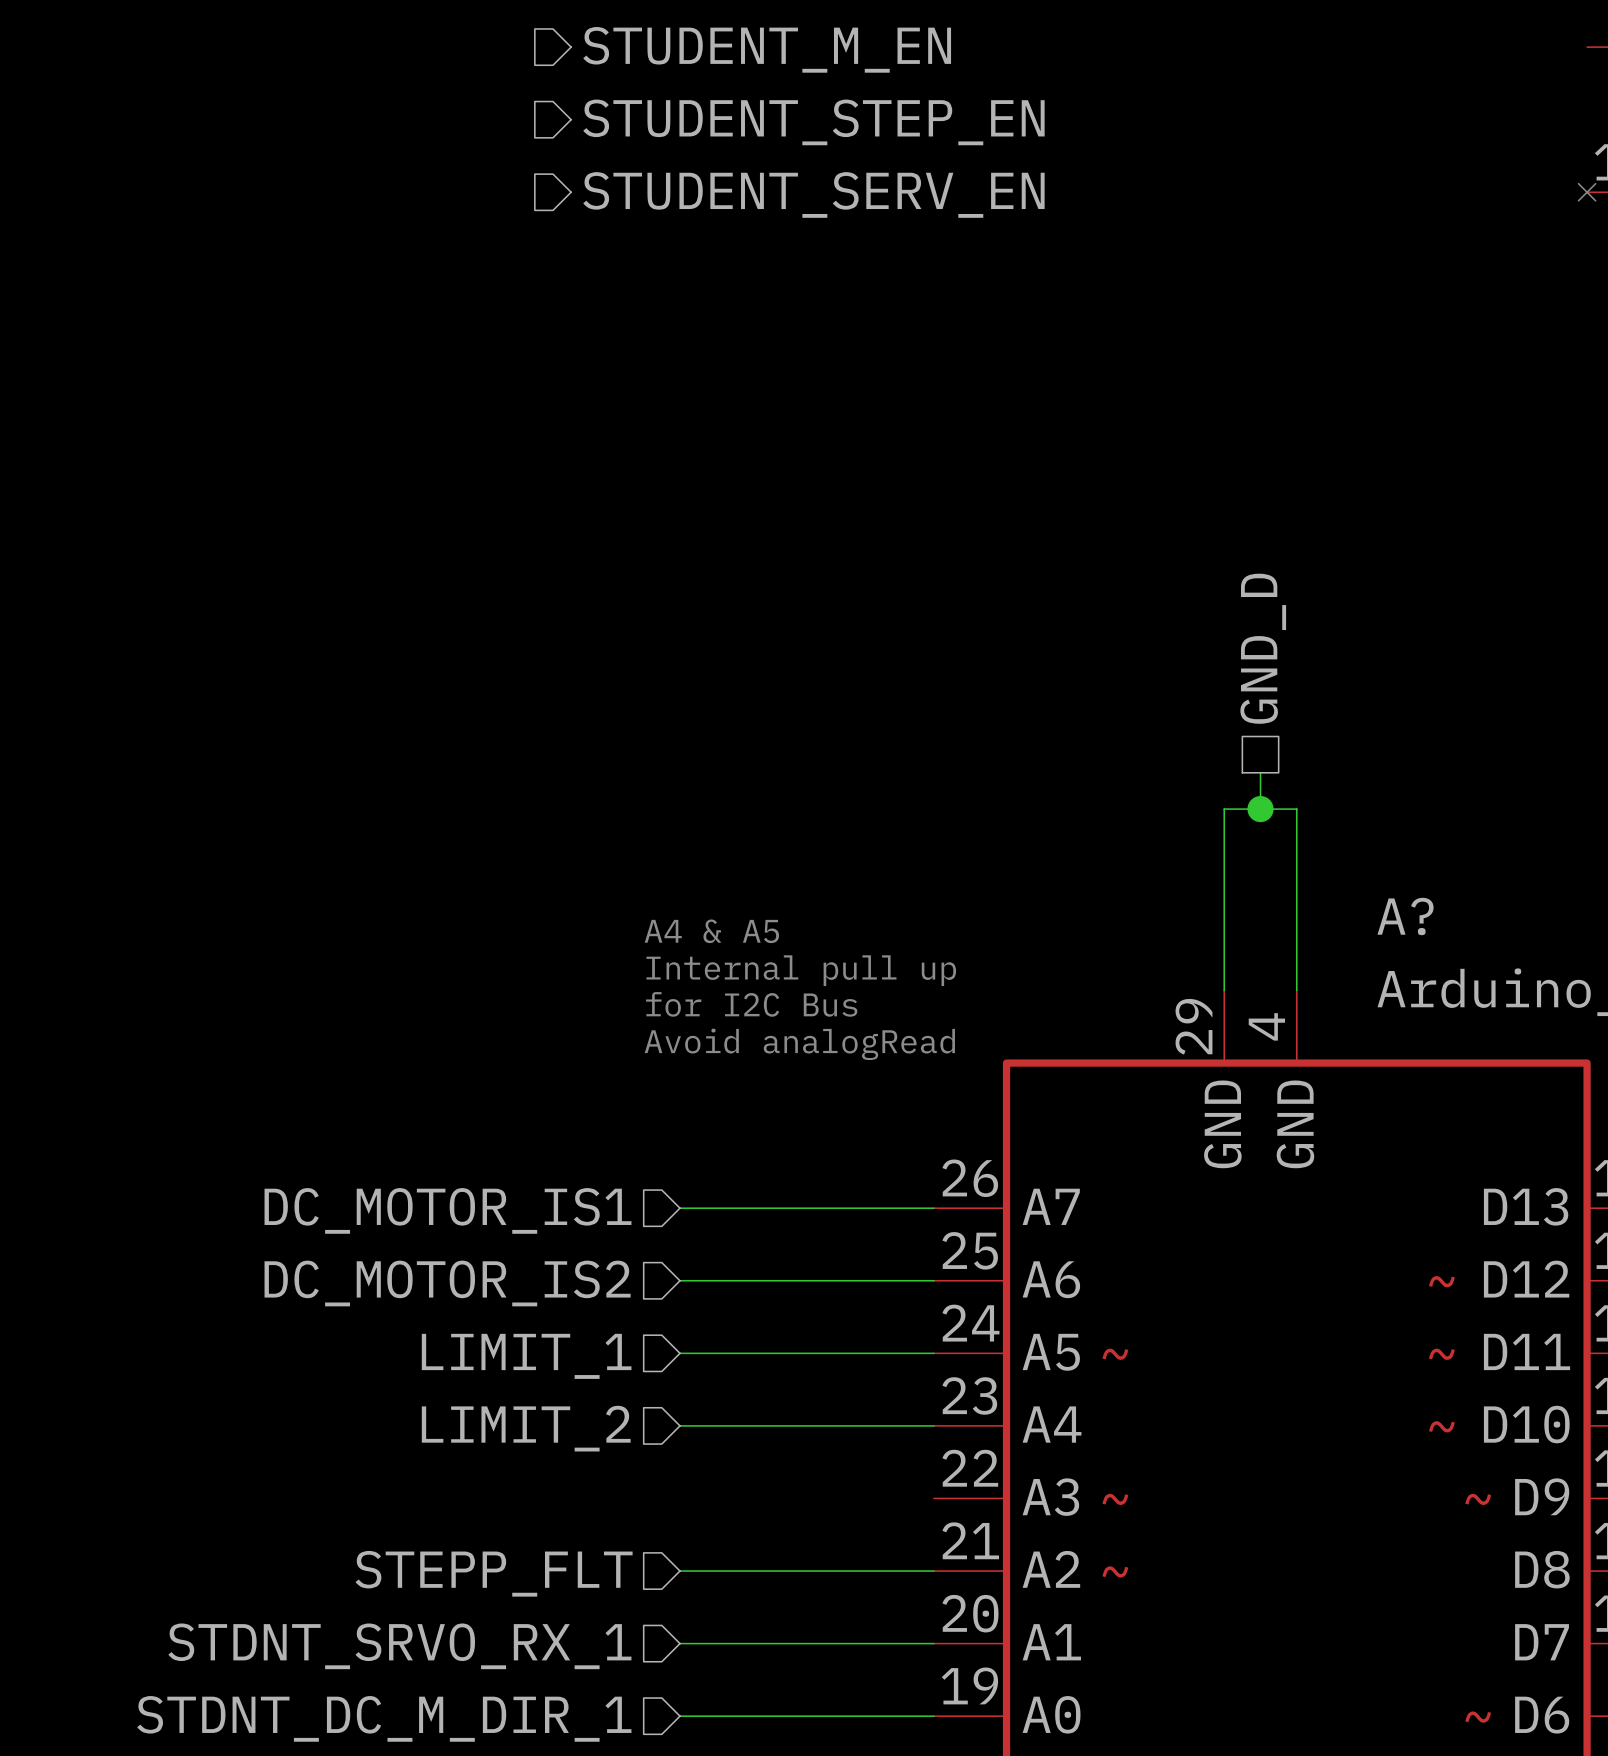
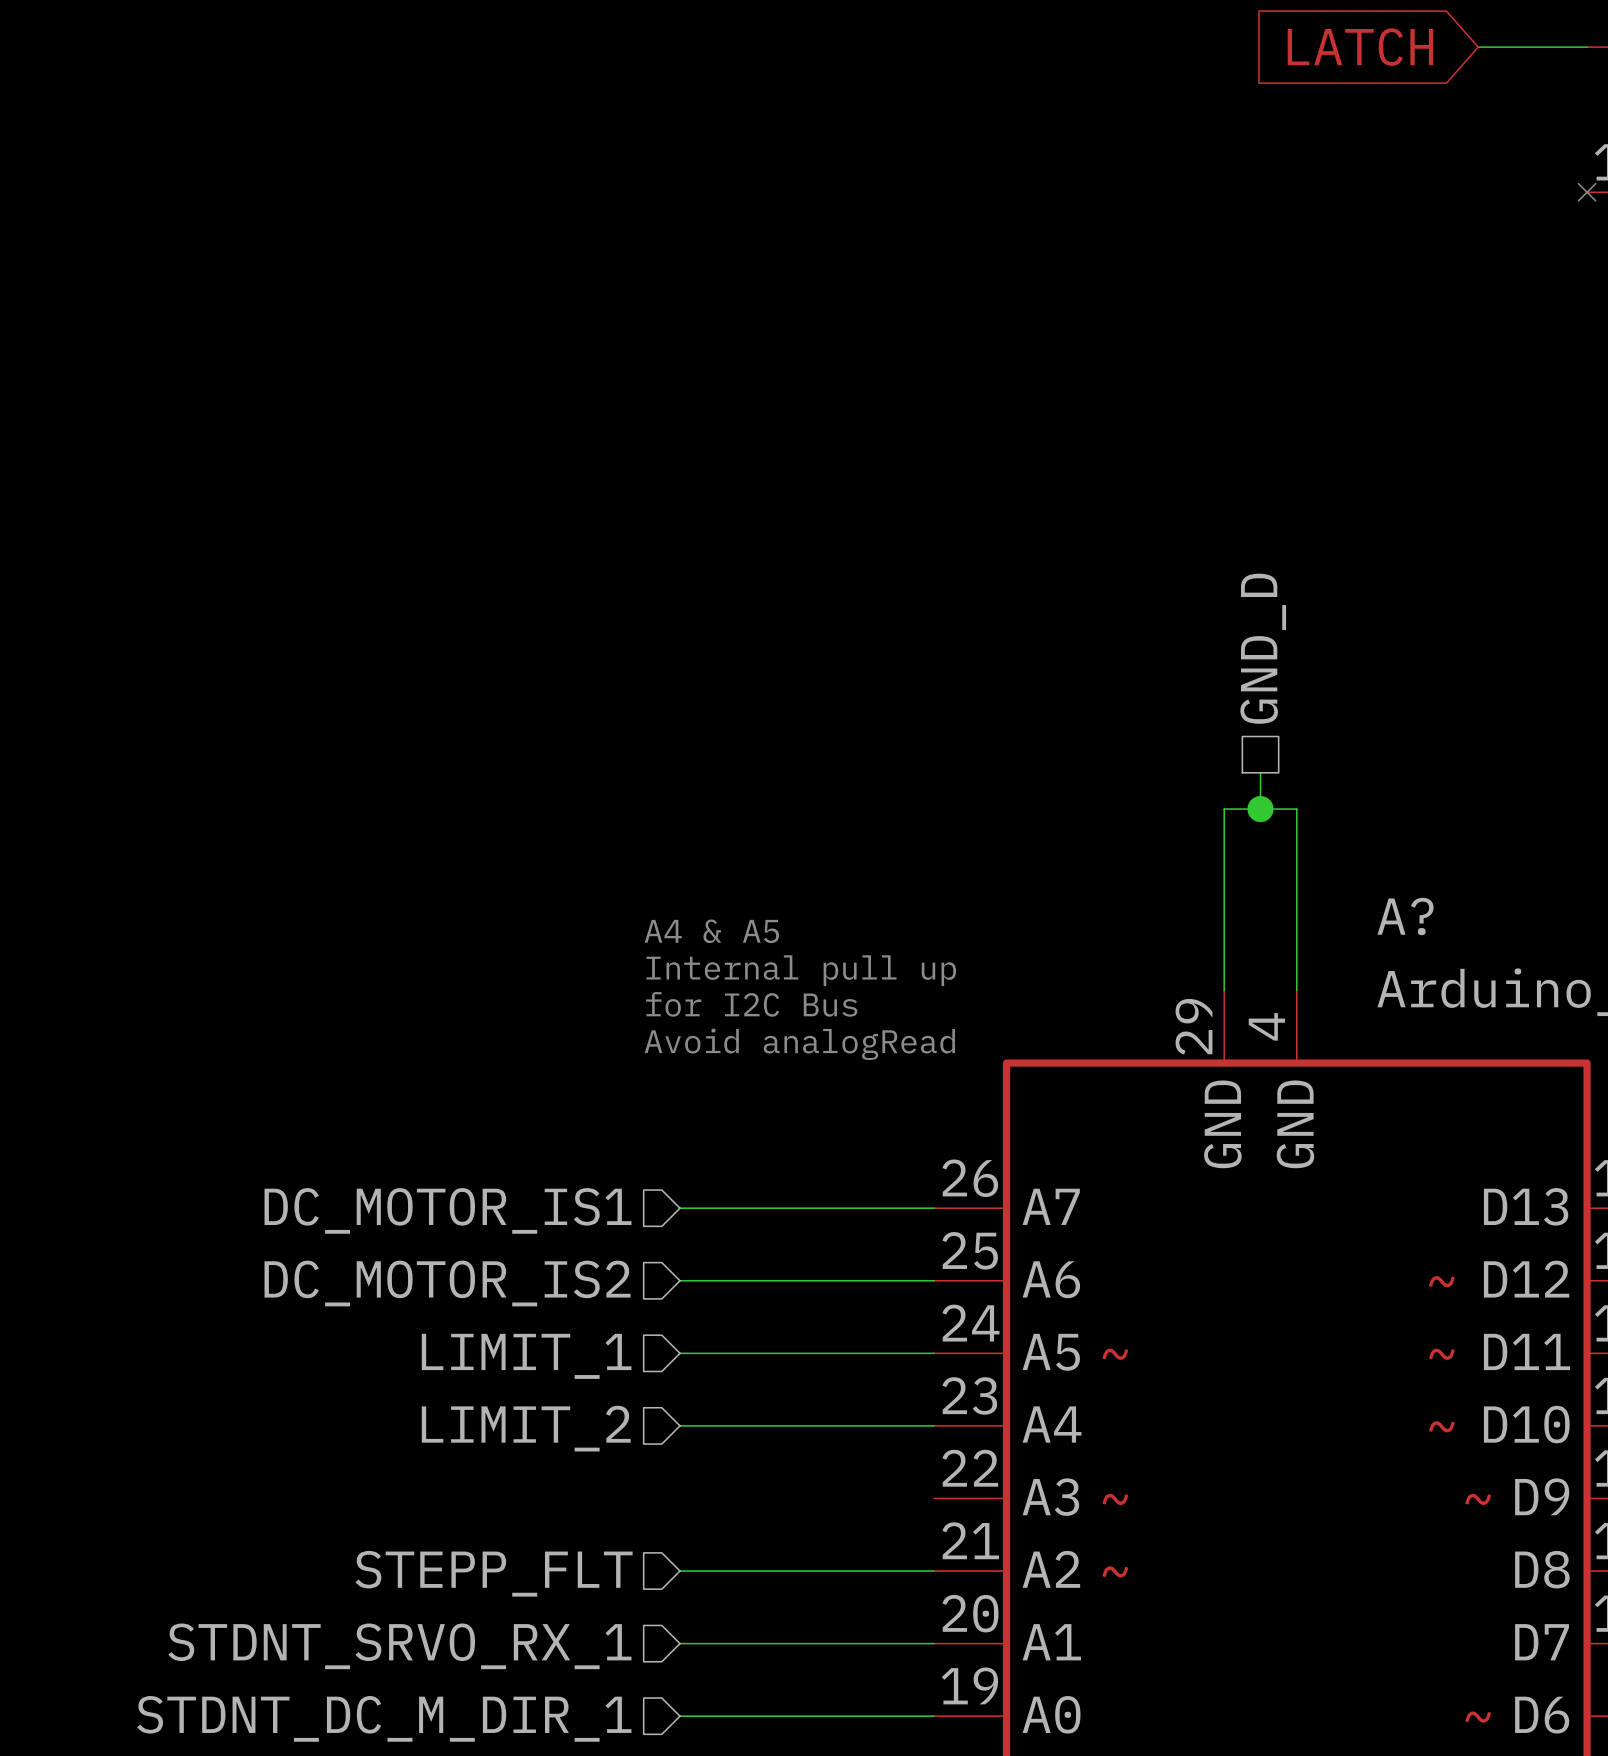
global label: none -> LATCH (1360, 47)
wire: none -> (1478, 47) (1587, 47)
hierarchical label: STUDENT_M_EN (767, 49) -> none
hierarchical label: STUDENT_STEP_EN (813, 122) -> none
hierarchical label: STUDENT_SERV_EN (813, 194) -> none

